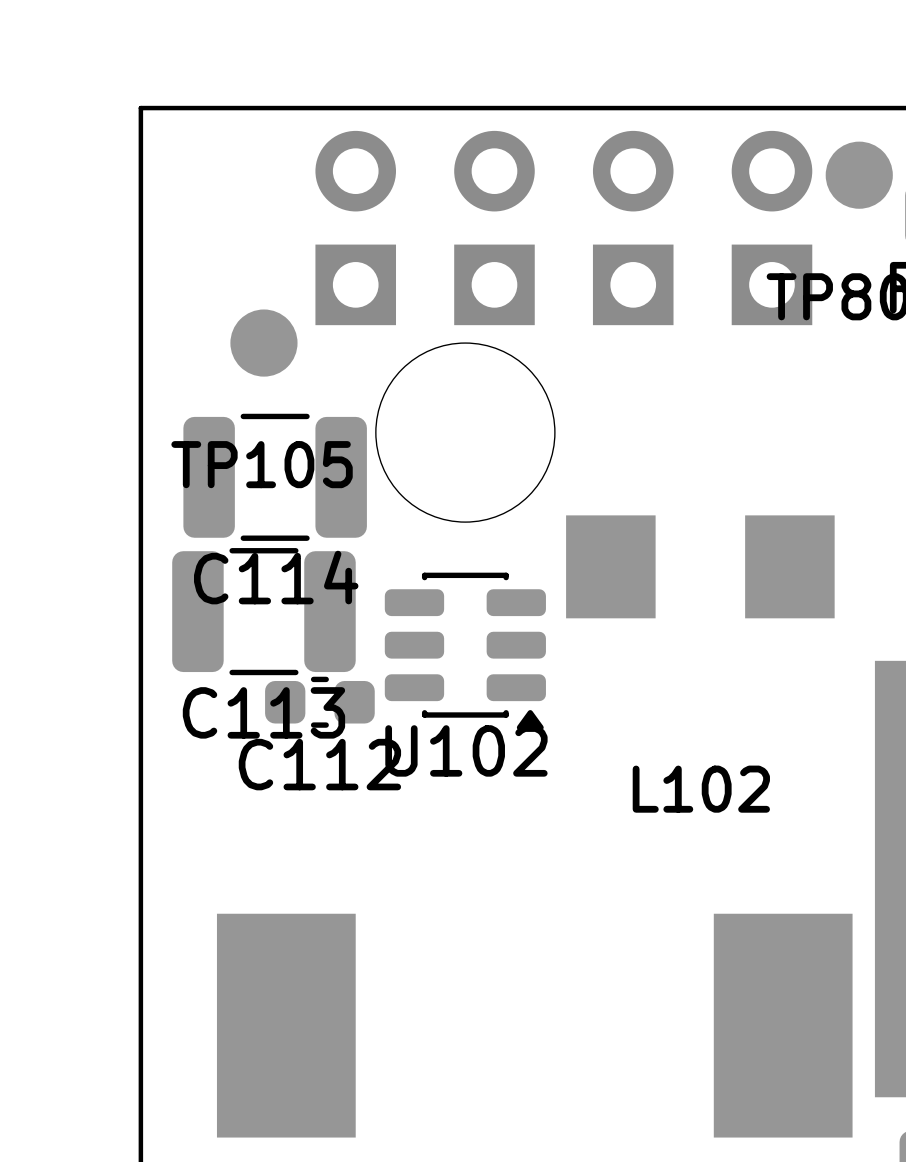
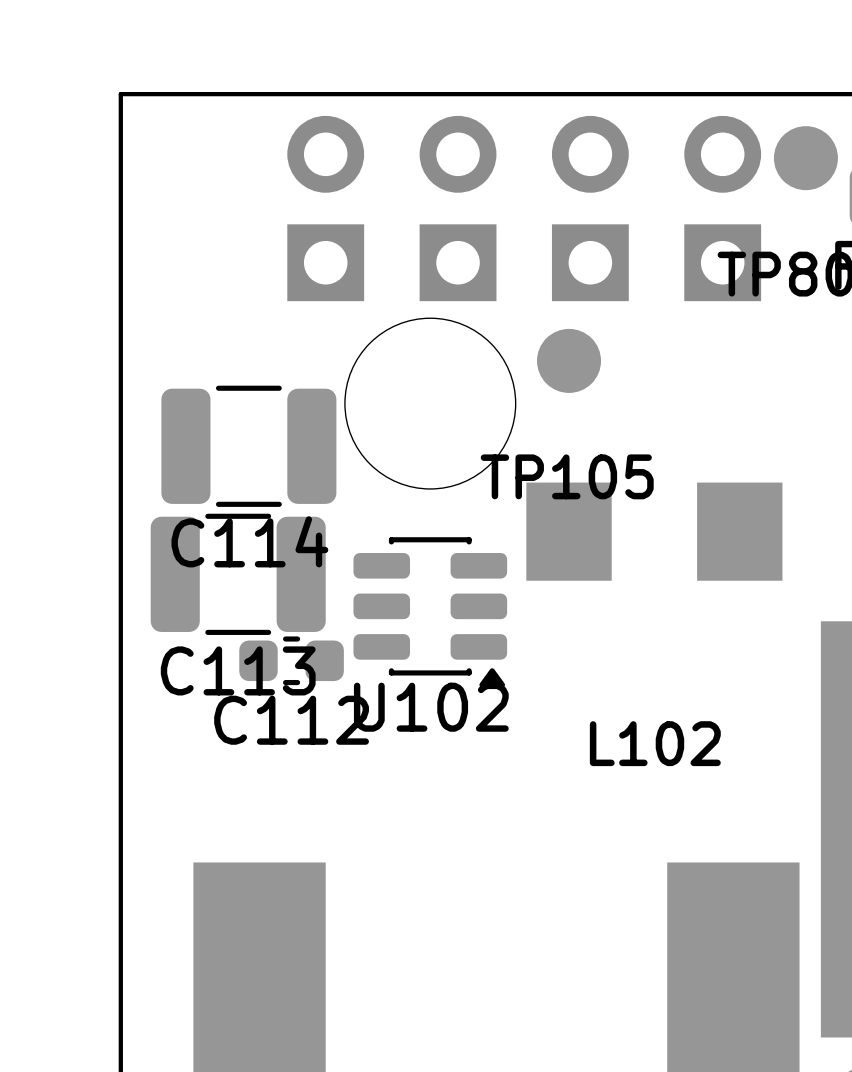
TP105 position: (263, 343) -> (569, 360)

